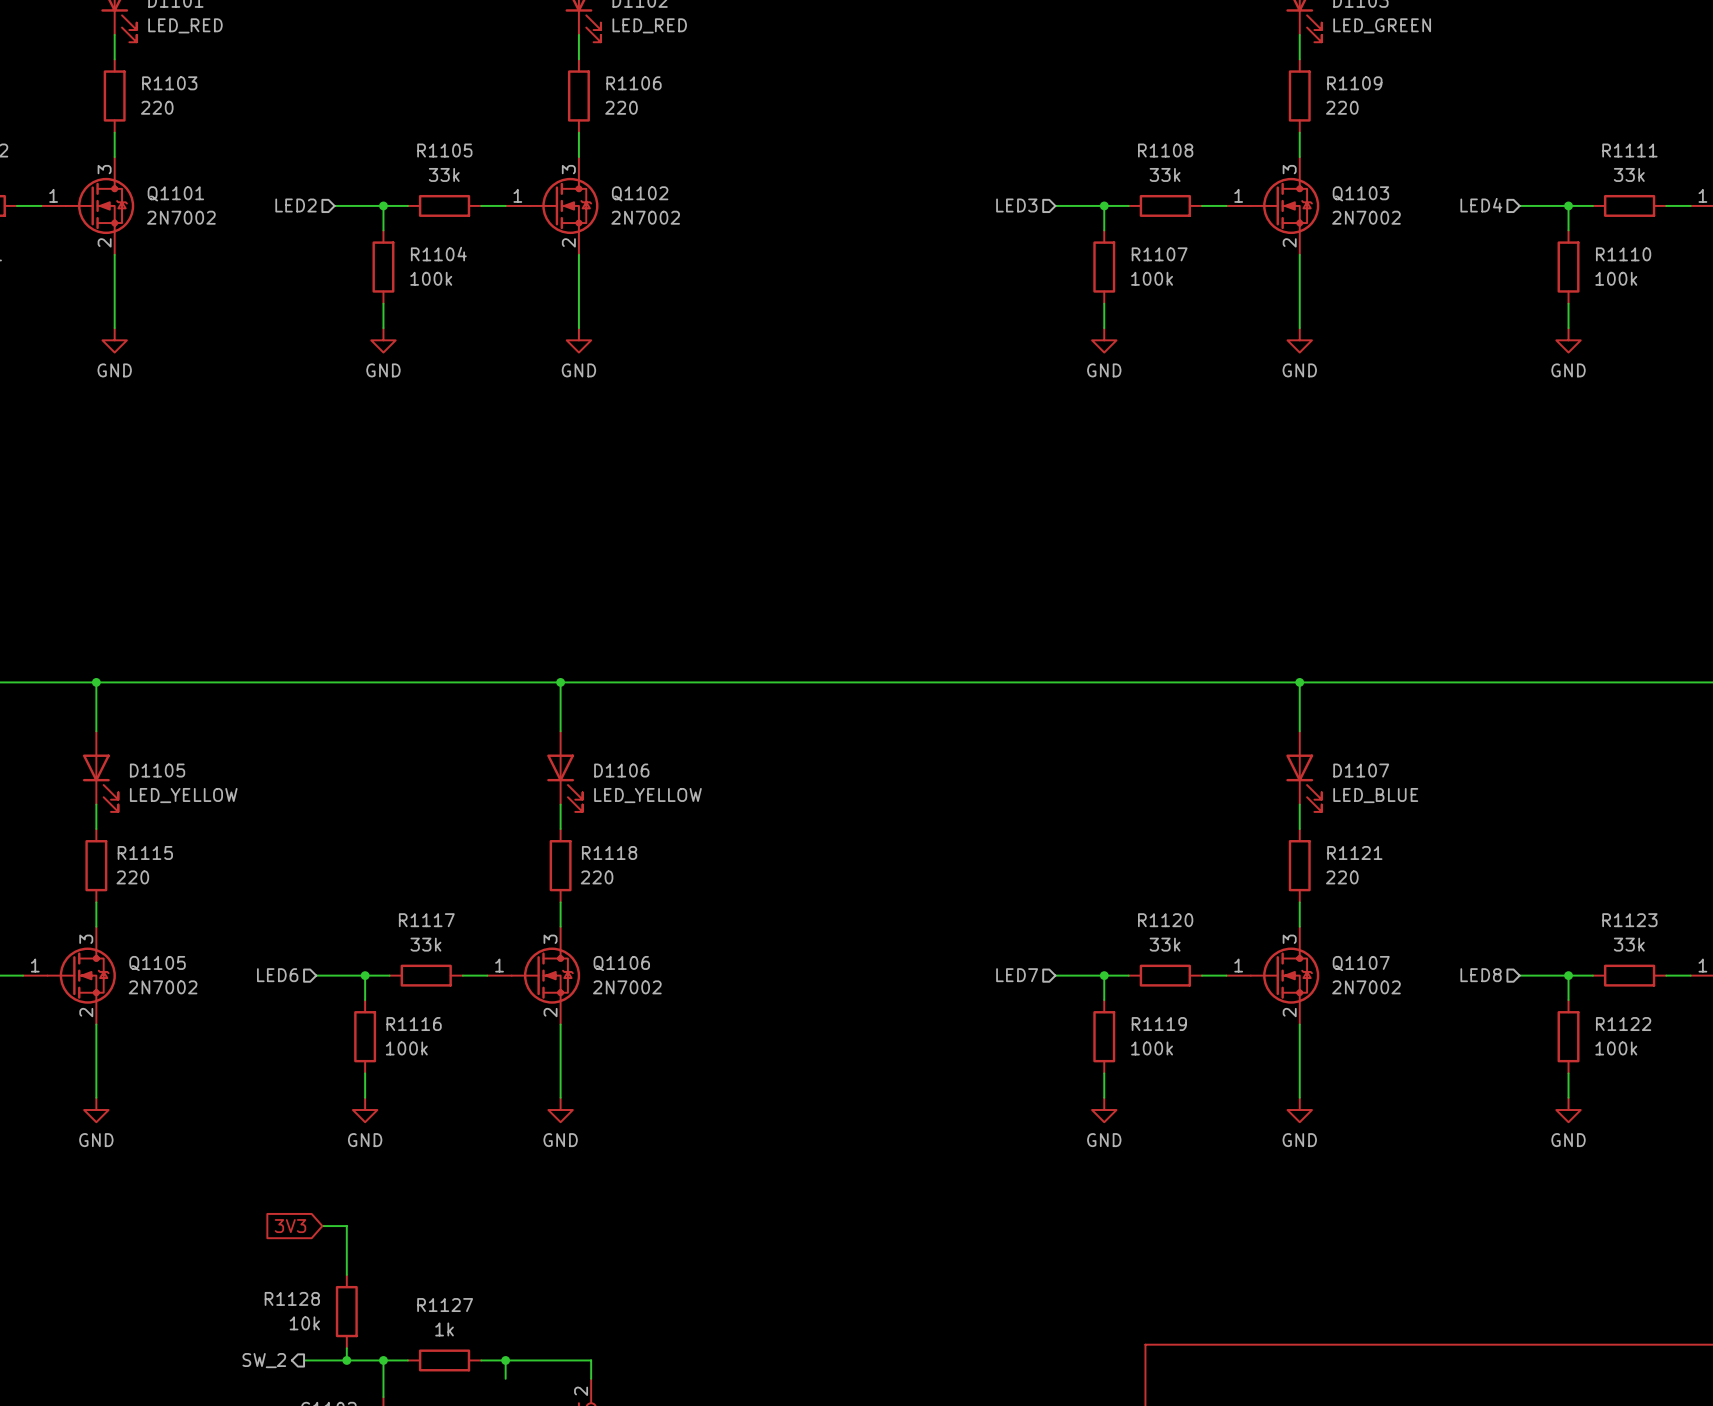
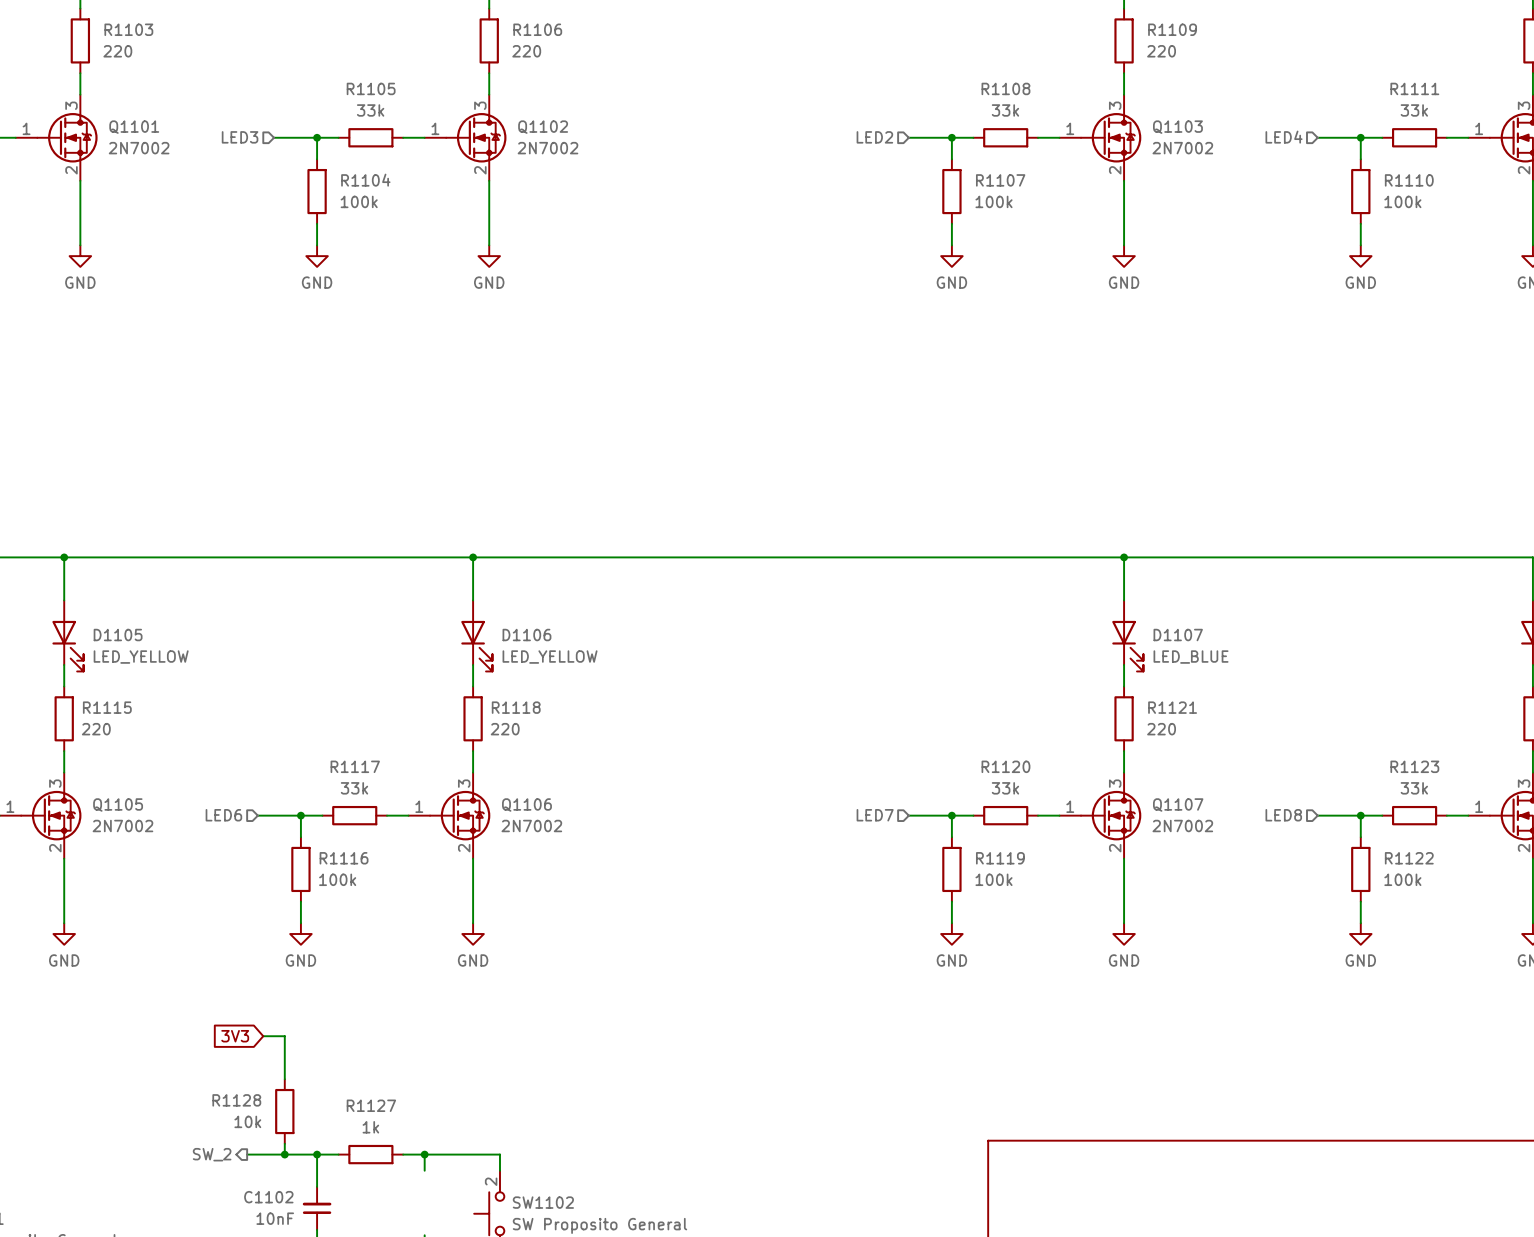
hierarchical label: LED2 (296, 205) -> LED3 (240, 137)
hierarchical label: LED3 (1016, 205) -> LED2 (874, 137)

